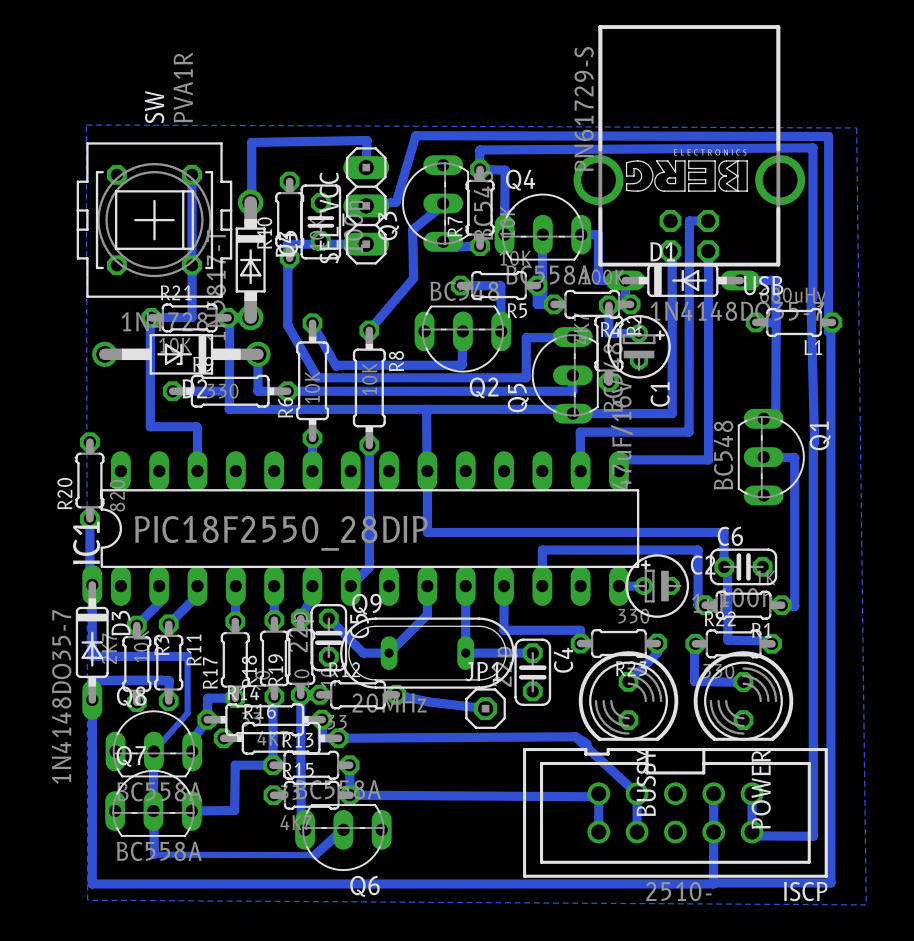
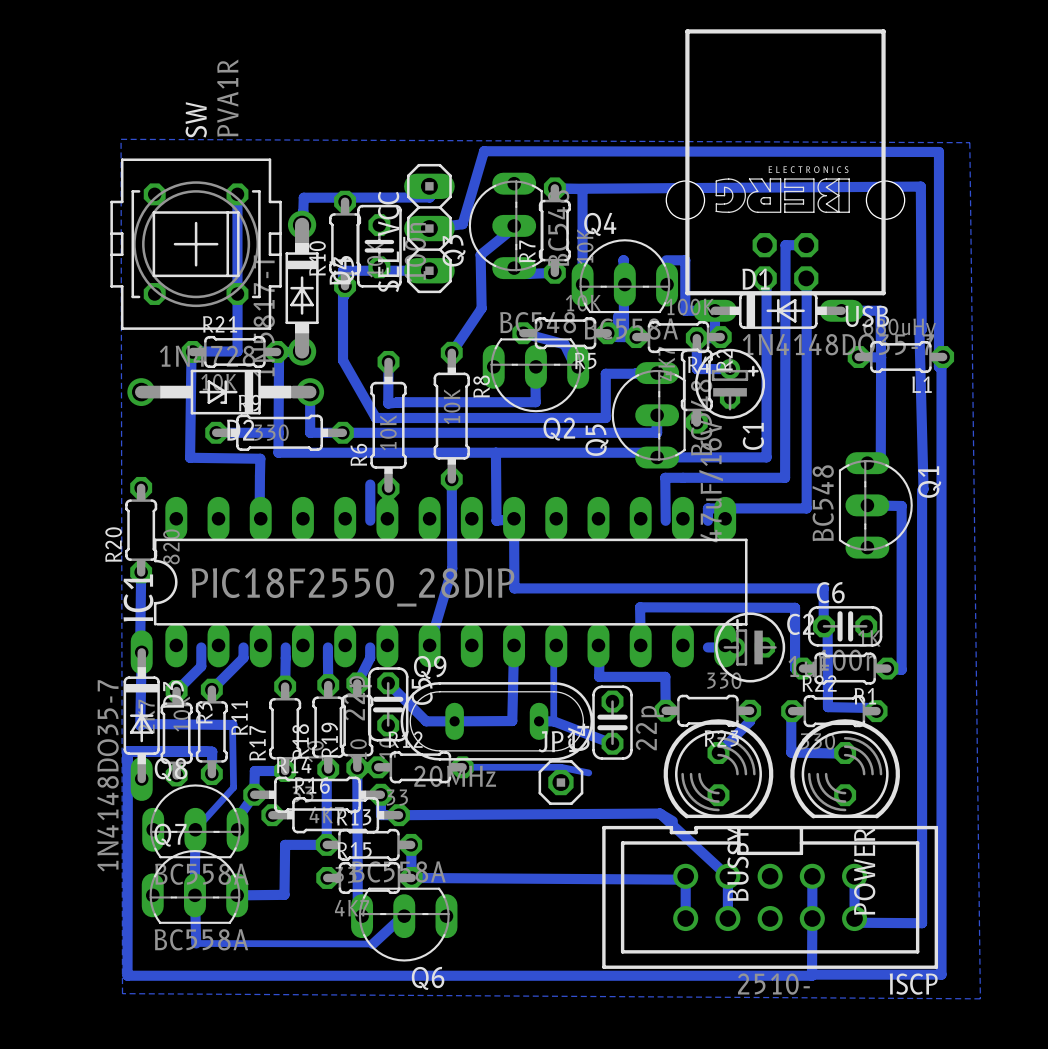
USB footprint: [573, 25, 806, 267] -> [666, 29, 905, 296]
USB value: PN61729-S (584, 109) -> none
bottom track: (366, 167) (367, 140) (251, 142) (251, 190) -> (429, 186) (429, 197) (303, 197) (303, 211)
bottom track: (479, 169) (479, 150) (812, 147) (812, 297) -> (554, 188) (920, 186) (921, 329)
bottom track: (505, 170) (504, 234) -> (582, 189) (582, 284)
Q4 position: (542, 227) -> (624, 276)
bottom track: (413, 278) (369, 330) -> (481, 308) (451, 352)
bottom track: (460, 285) (500, 285) (501, 331) -> none
R5 position: (499, 285) -> (565, 333)
bottom track: none -> (523, 333) (564, 344) (577, 371)
bottom track: (150, 317) (150, 426) (196, 426) (197, 471) -> (191, 351) (190, 457) (260, 458) (260, 518)
bottom track: (312, 323) (336, 366) (462, 365) (462, 331) -> none
bottom track: none -> (388, 361) (388, 403) (535, 402) (535, 371)
R6 position: (312, 380) -> (388, 425)
R8 position: (369, 387) -> (451, 416)
bottom track: none -> (451, 479) (452, 568) (429, 645)
bottom track: (369, 445) (369, 567) (350, 586) -> none
bottom track: (427, 471) (427, 532) (443, 532) -> (496, 520) (514, 518) (514, 588)
R20 position: (89, 480) -> (141, 530)
bottom track: (89, 518) (91, 656) (187, 656) (187, 713) (153, 751) -> (141, 572) (140, 725) (143, 723) (232, 724) (233, 787) (195, 829)
IC1 position: (369, 528) -> (450, 582)
bottom track: (698, 550) (542, 550) (542, 586) -> (795, 607) (640, 607) (640, 645)
bottom track: none -> (556, 645) (553, 645) (553, 721) (612, 743)
bottom track: (427, 586) (427, 614) (389, 653) -> (514, 645) (512, 721) (454, 721)
bottom track: (465, 586) (465, 653) -> none
bottom track: (504, 586) (503, 630) (580, 630) (580, 643) -> (598, 645) (599, 643) (599, 676) (665, 676) (665, 710)
D3 position: (92, 642) -> (141, 715)
bottom track: (479, 653) (532, 653) -> none
C4 rotation: 0° (532, 672) -> 180° (612, 722)
bottom track: (396, 694) (428, 701) (485, 708) -> (462, 767) (560, 767) (588, 772)

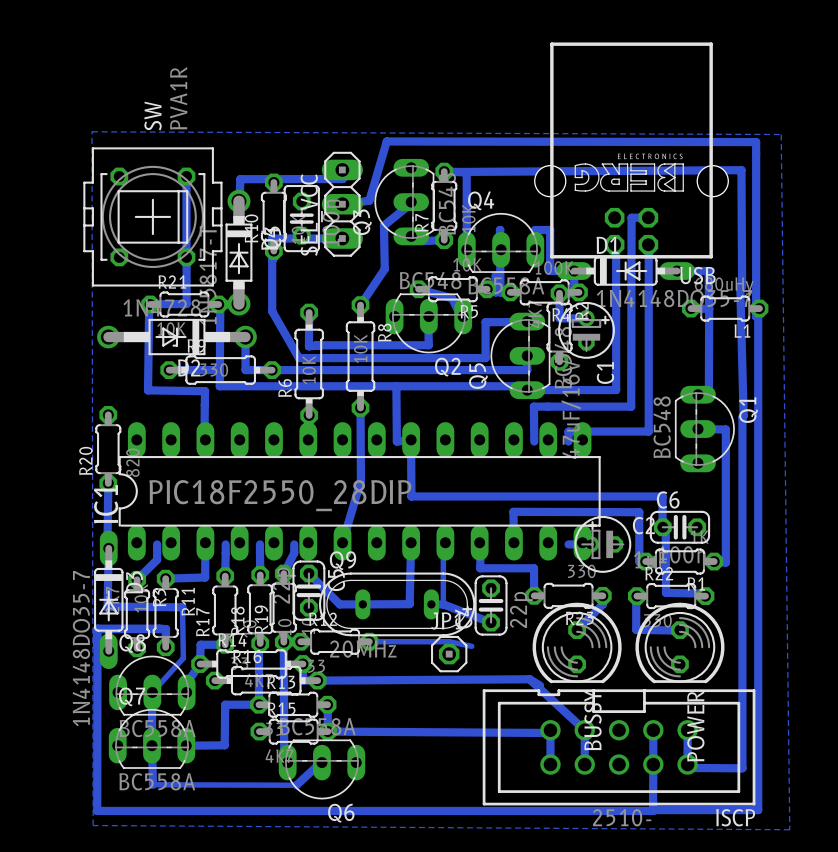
bottom track: (370, 484) (370, 520) -> none
bottom track: (243, 647) (243, 658) (211, 689) -> (205, 542) (205, 577) (165, 578)

